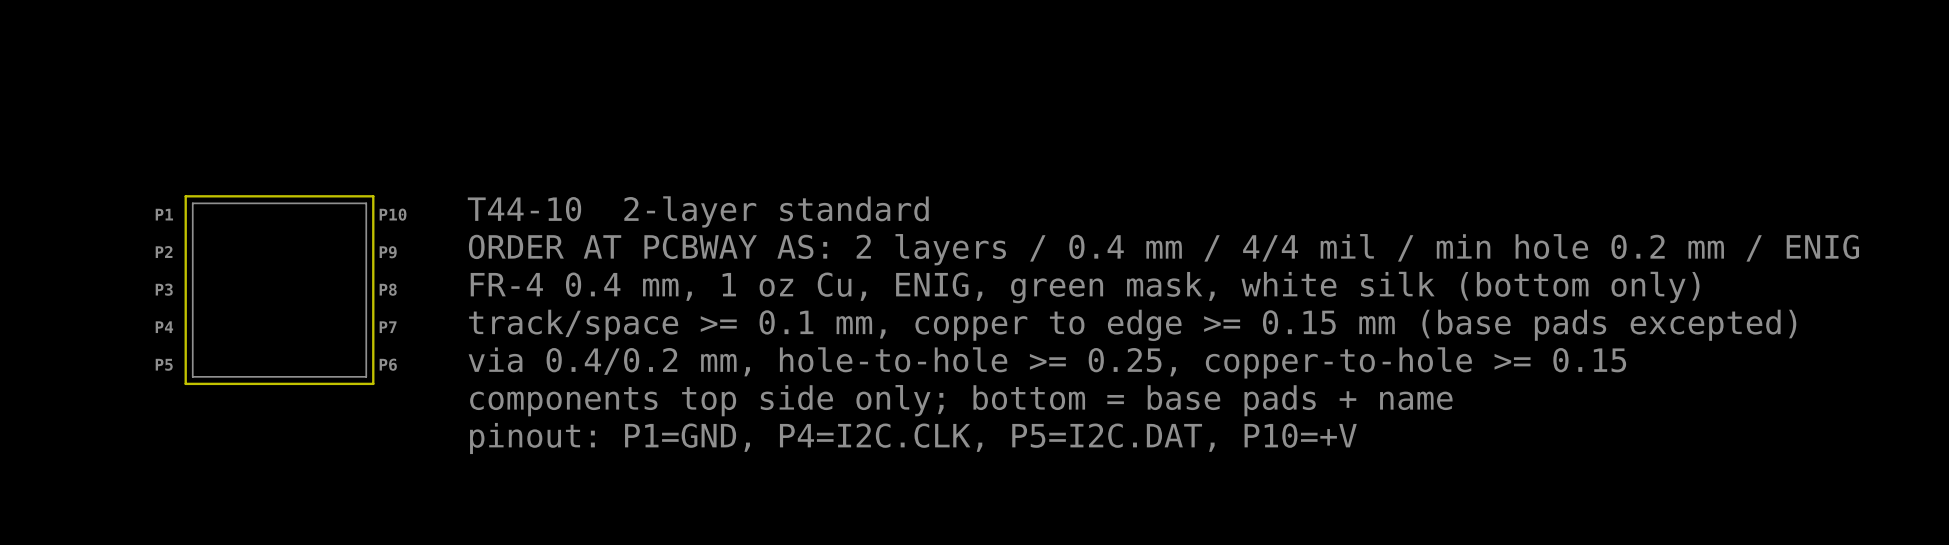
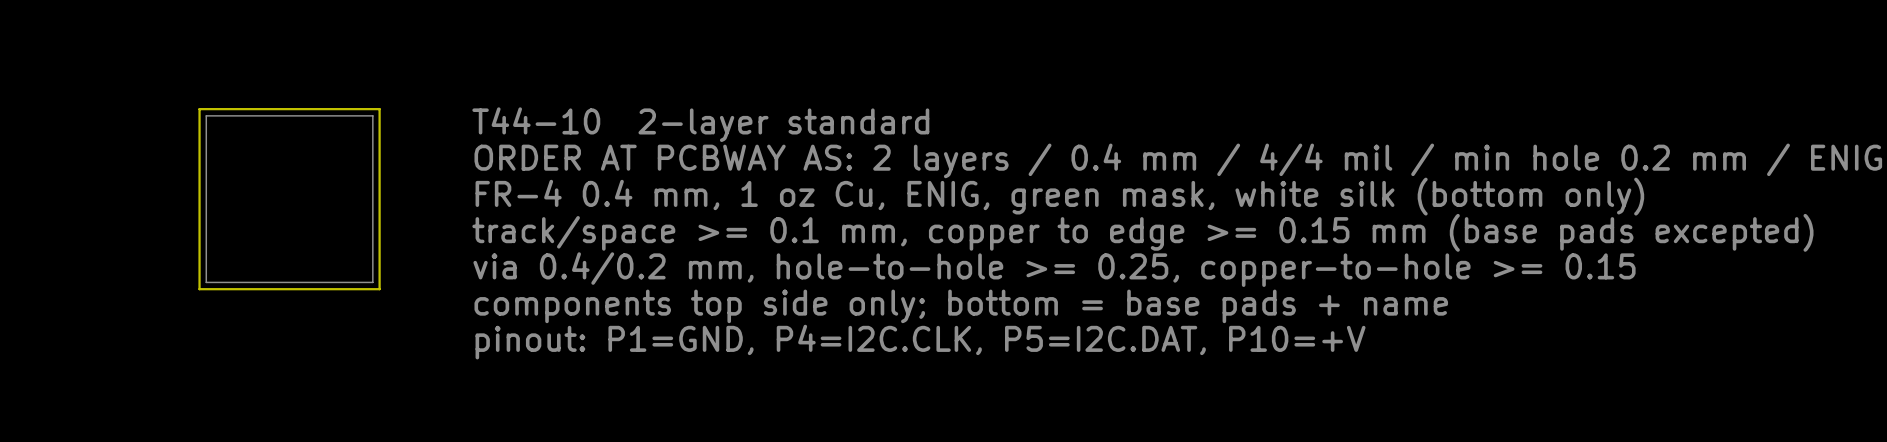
text: P1 (164, 214) -> none
text: P10 (393, 214) -> none
text: P2 (164, 252) -> none
text: P9 (388, 252) -> none
text: P3 (164, 289) -> none
text: P8 (388, 289) -> none
text: P4 (164, 327) -> none
text: P7 (388, 327) -> none
text: P5 (164, 364) -> none
text: P6 (388, 364) -> none

